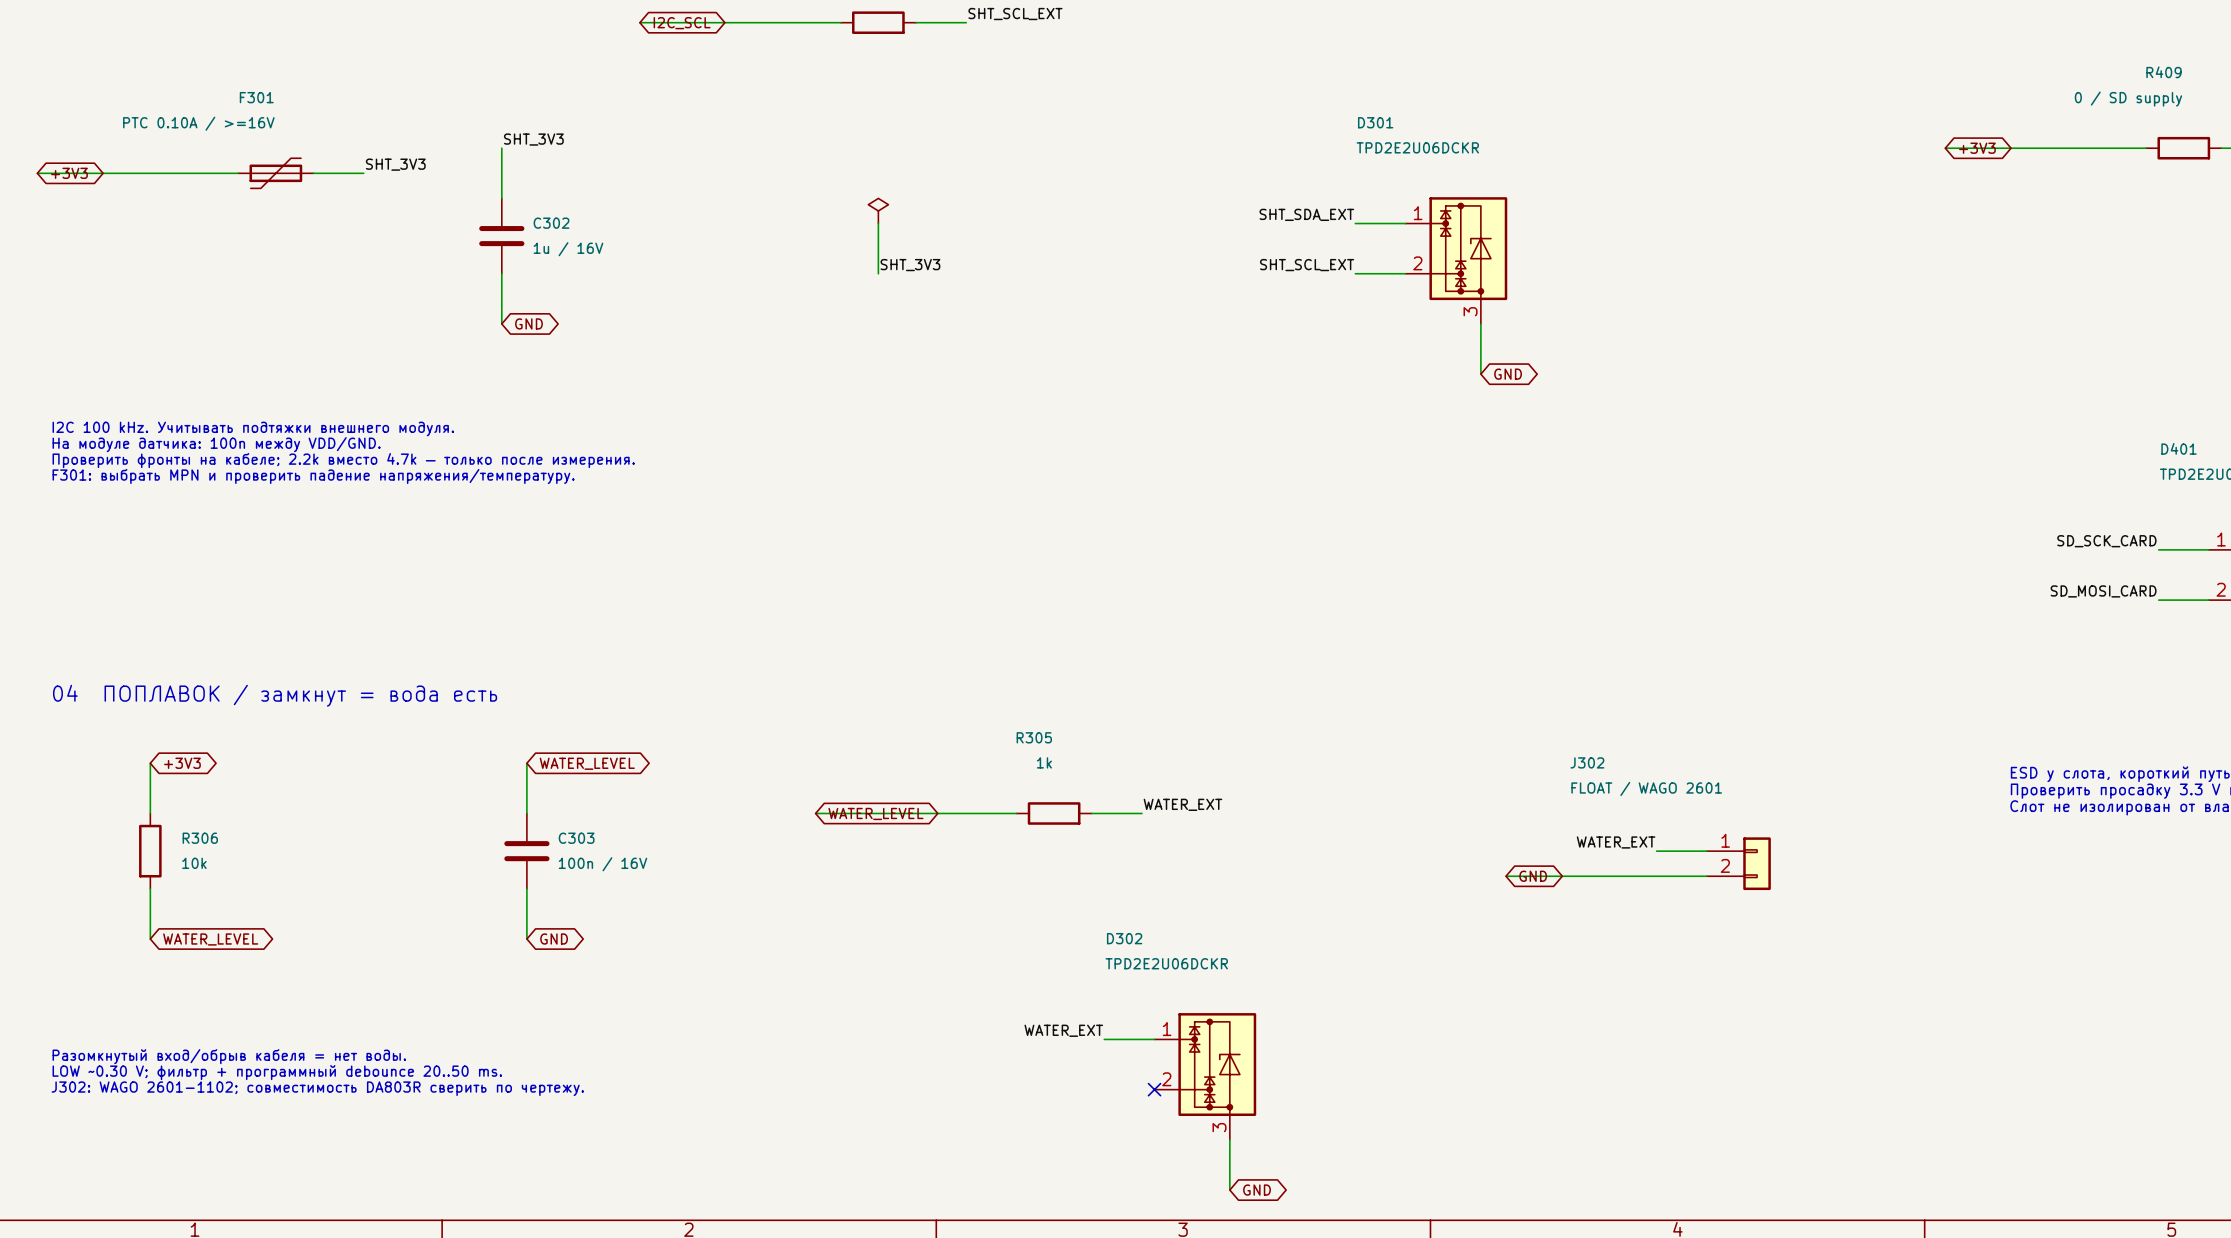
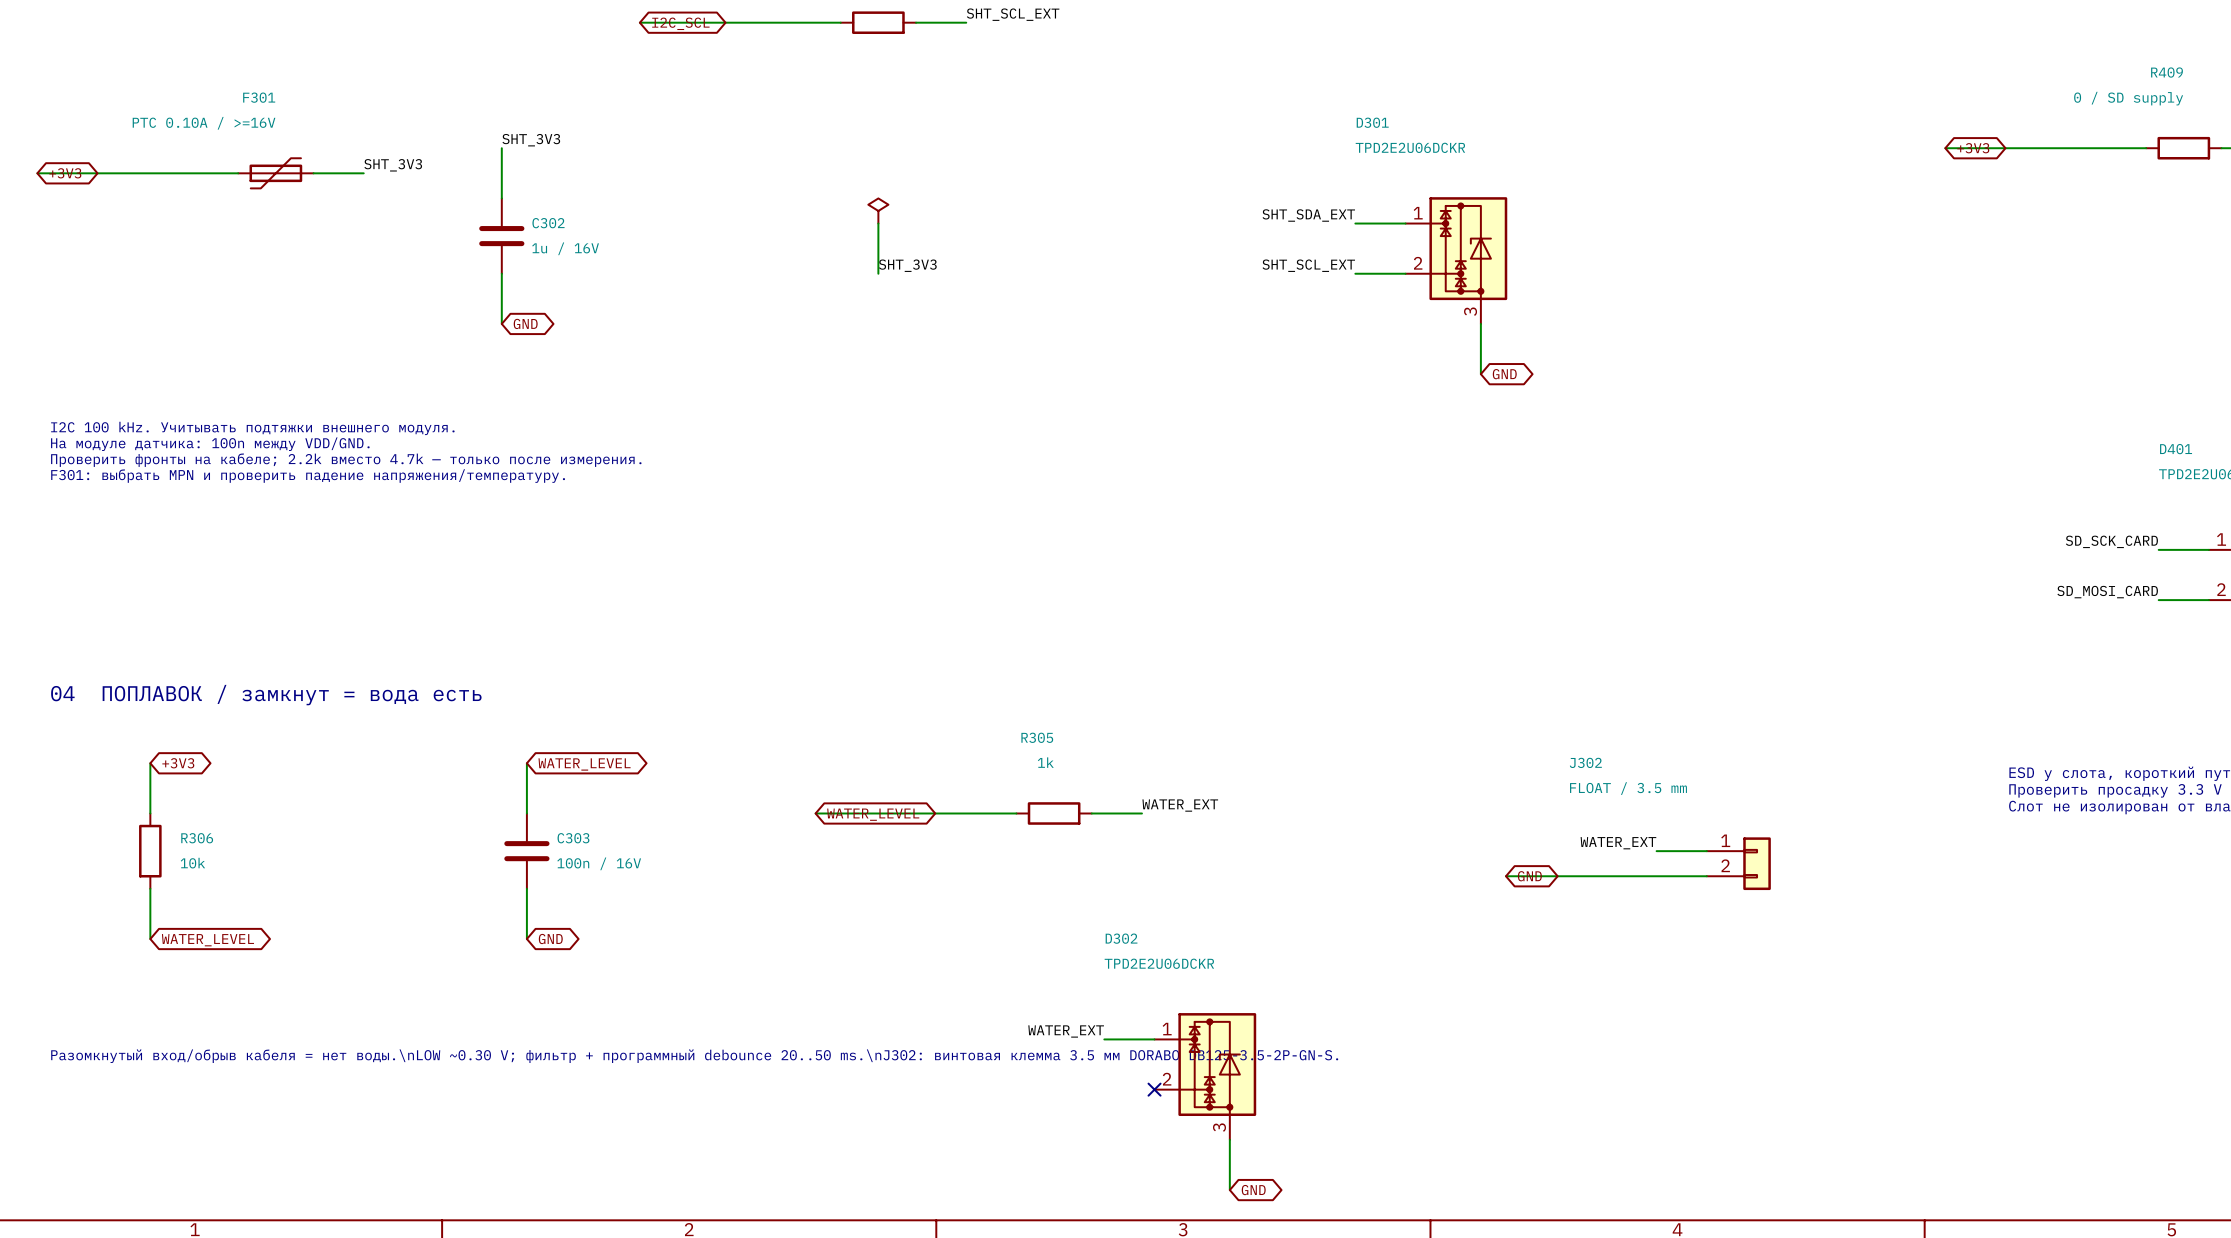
J302 value: FLOAT / WAGO 2601 (1646, 788) -> FLOAT / 3.5 mm (1628, 788)
text: Разомкнутый вход/обрыв кабеля = нет воды. (229, 1056) -> Разомкнутый вход/обрыв кабеля = нет воды.\nLOW ~0.30 V; фильтр + программный debounce 20..50 ms.\nJ302: винтовая клемма 3.5 мм DORABO DB125-3.5-2P-GN-S. (694, 1056)
text: LOW ~0.30 V; фильтр + программный debounce 20..50 ms. (277, 1072) -> none
text: J302: WAGO 2601-1102; совместимость DA803R сверить по чертежу. (317, 1088) -> none

